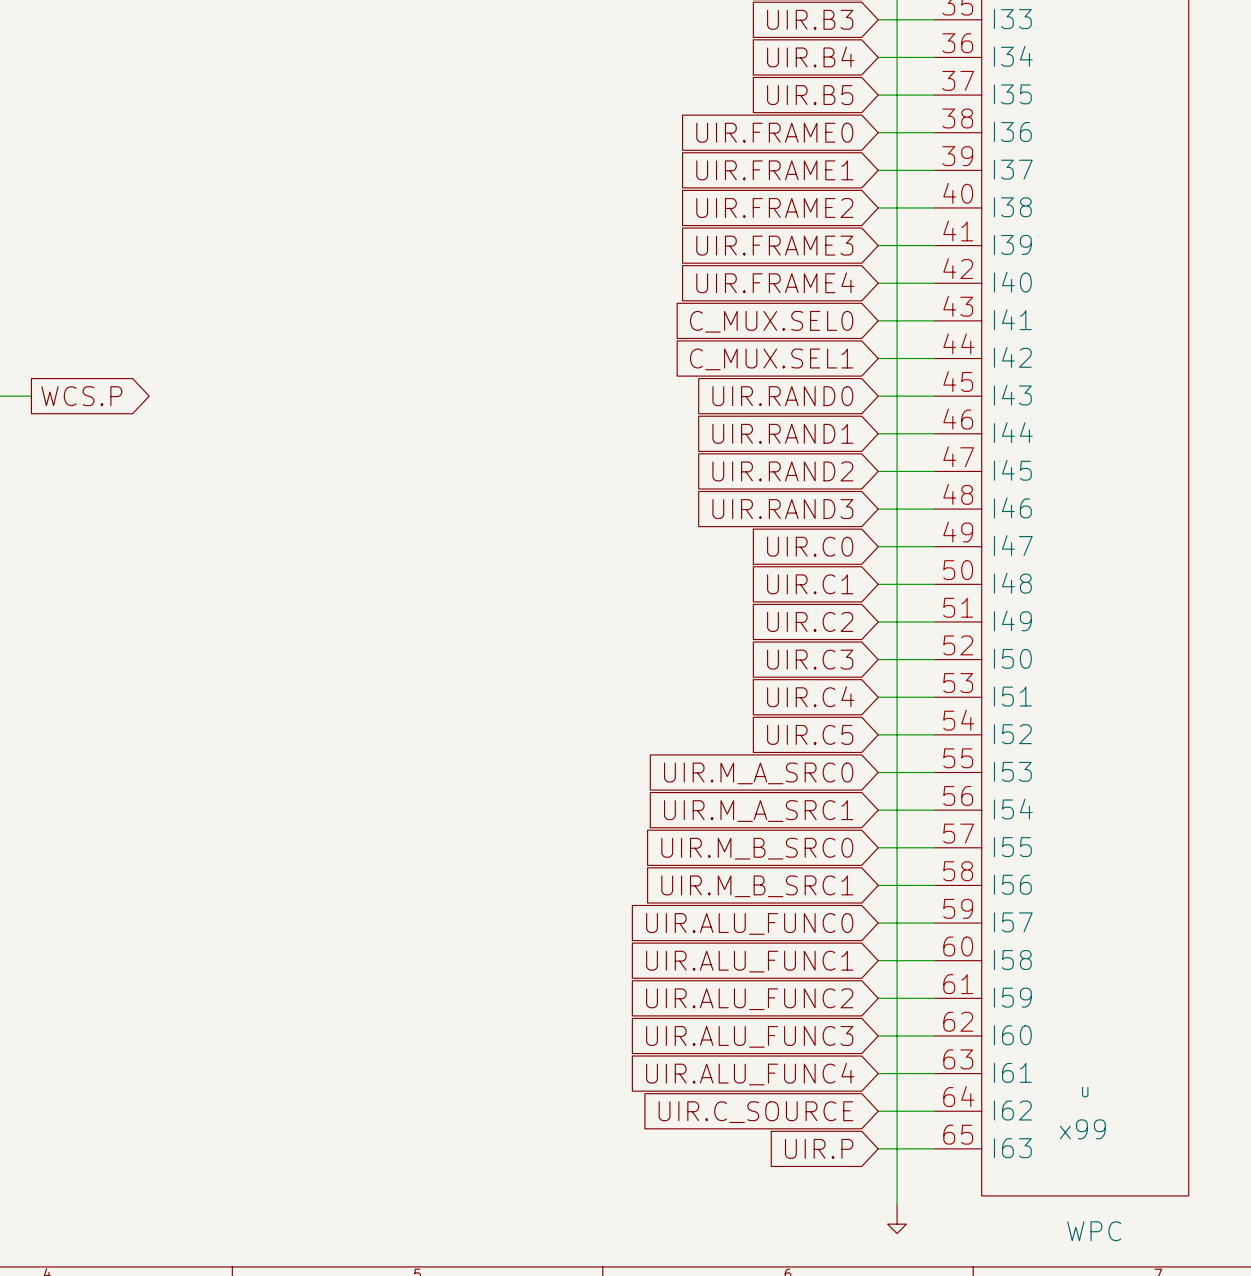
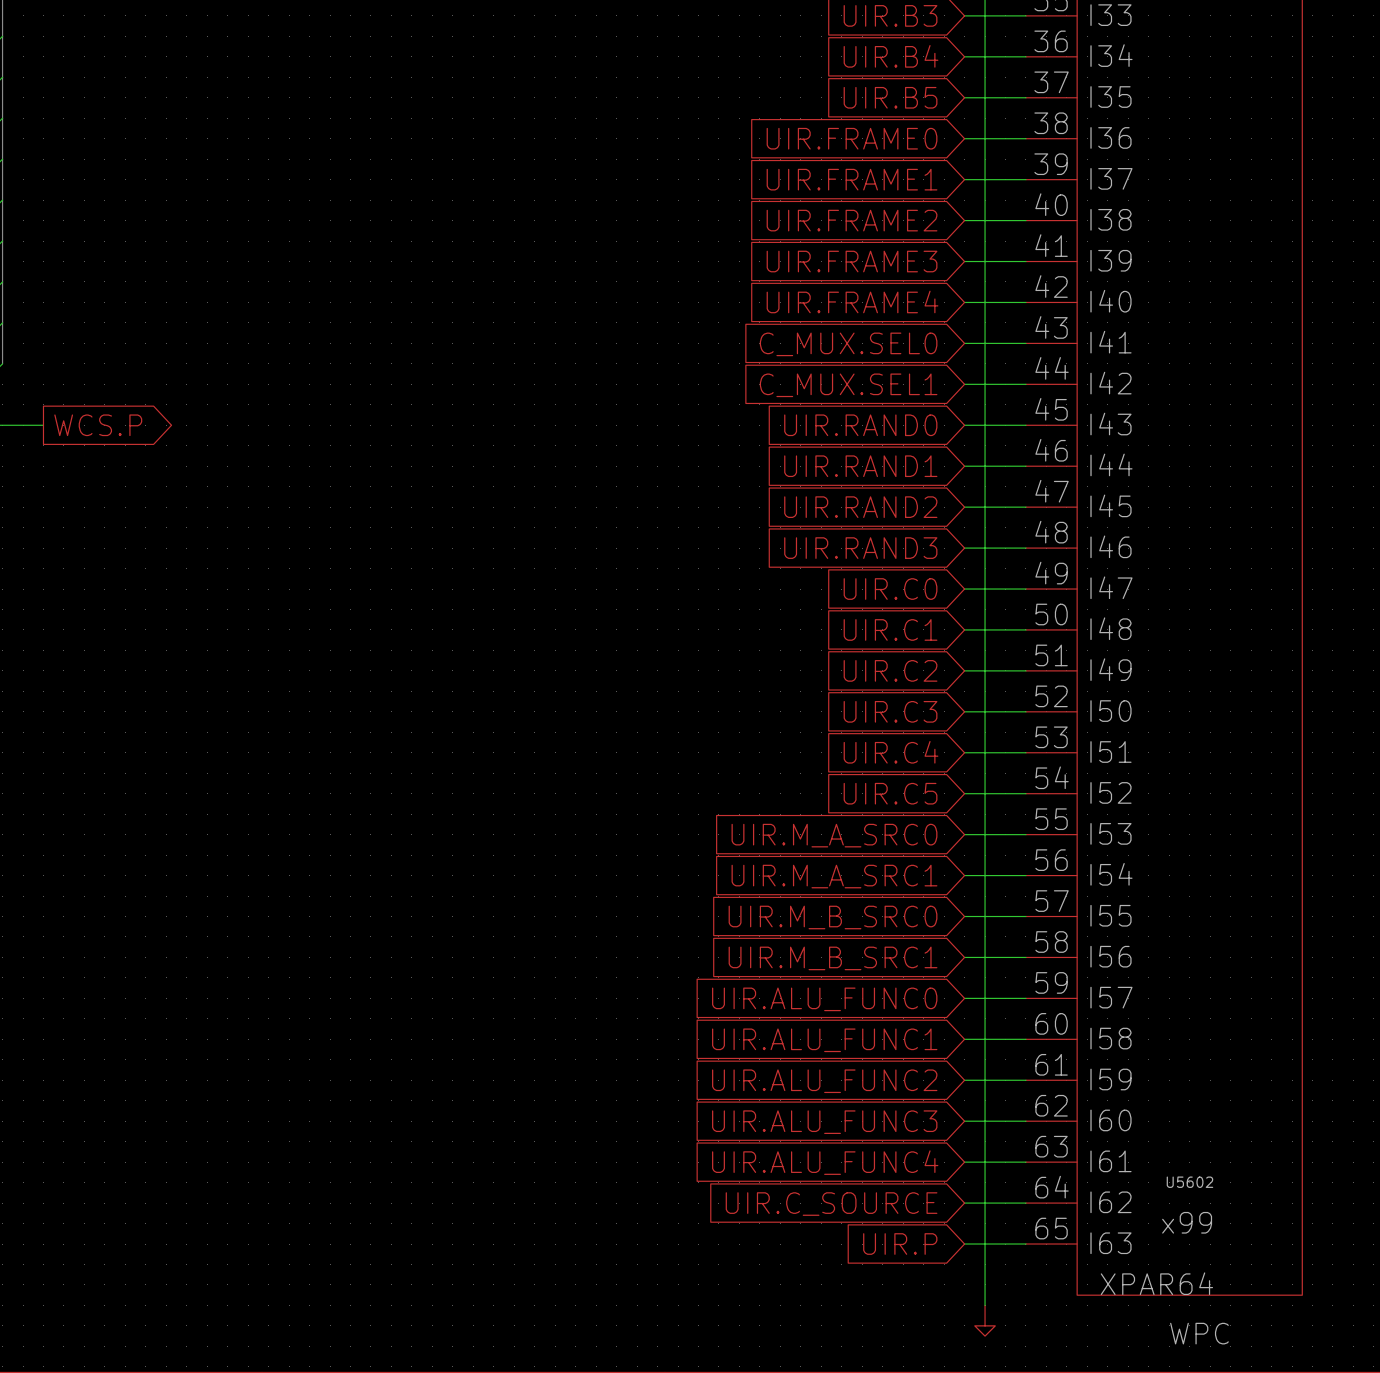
U name: U (1085, 1092) -> U5602 (1189, 1182)
U value: none -> XPAR64 (1156, 1283)

